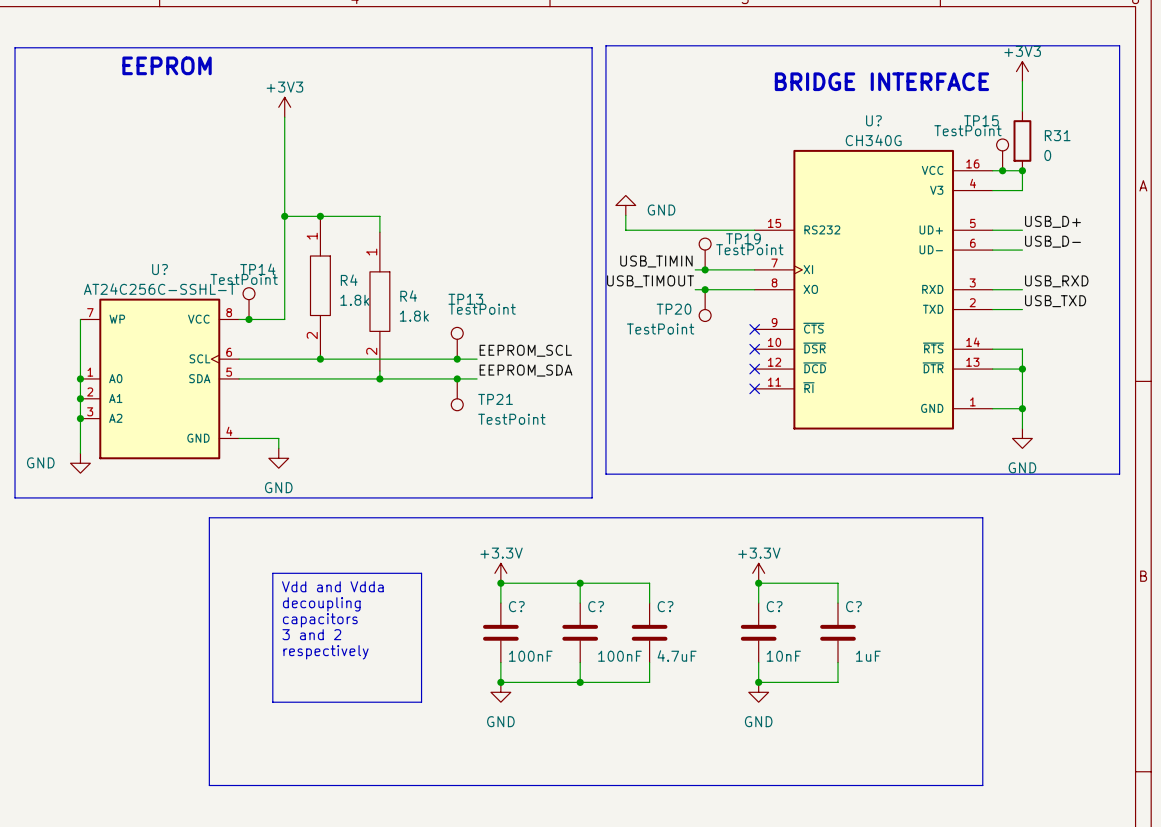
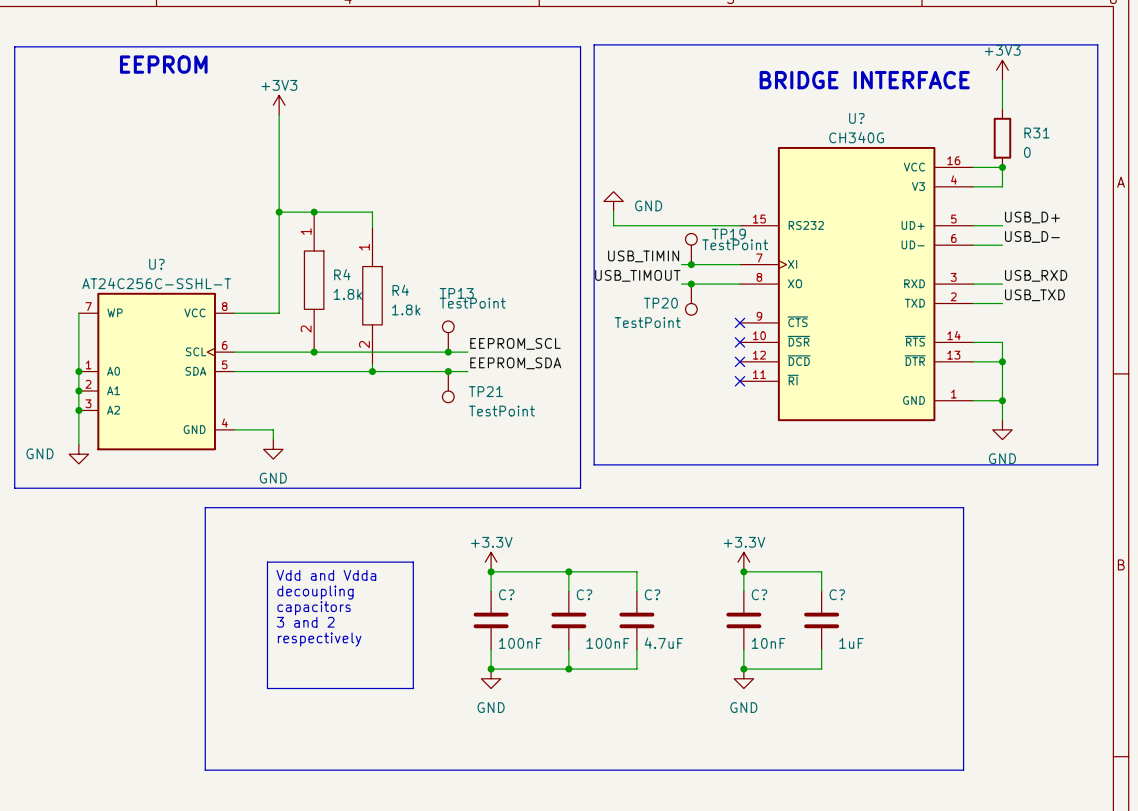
TP15: TestPoint (1002, 154) -> none
junction: (1002, 170) -> none
TP14: TestPoint (249, 303) -> none
junction: (249, 319) -> none

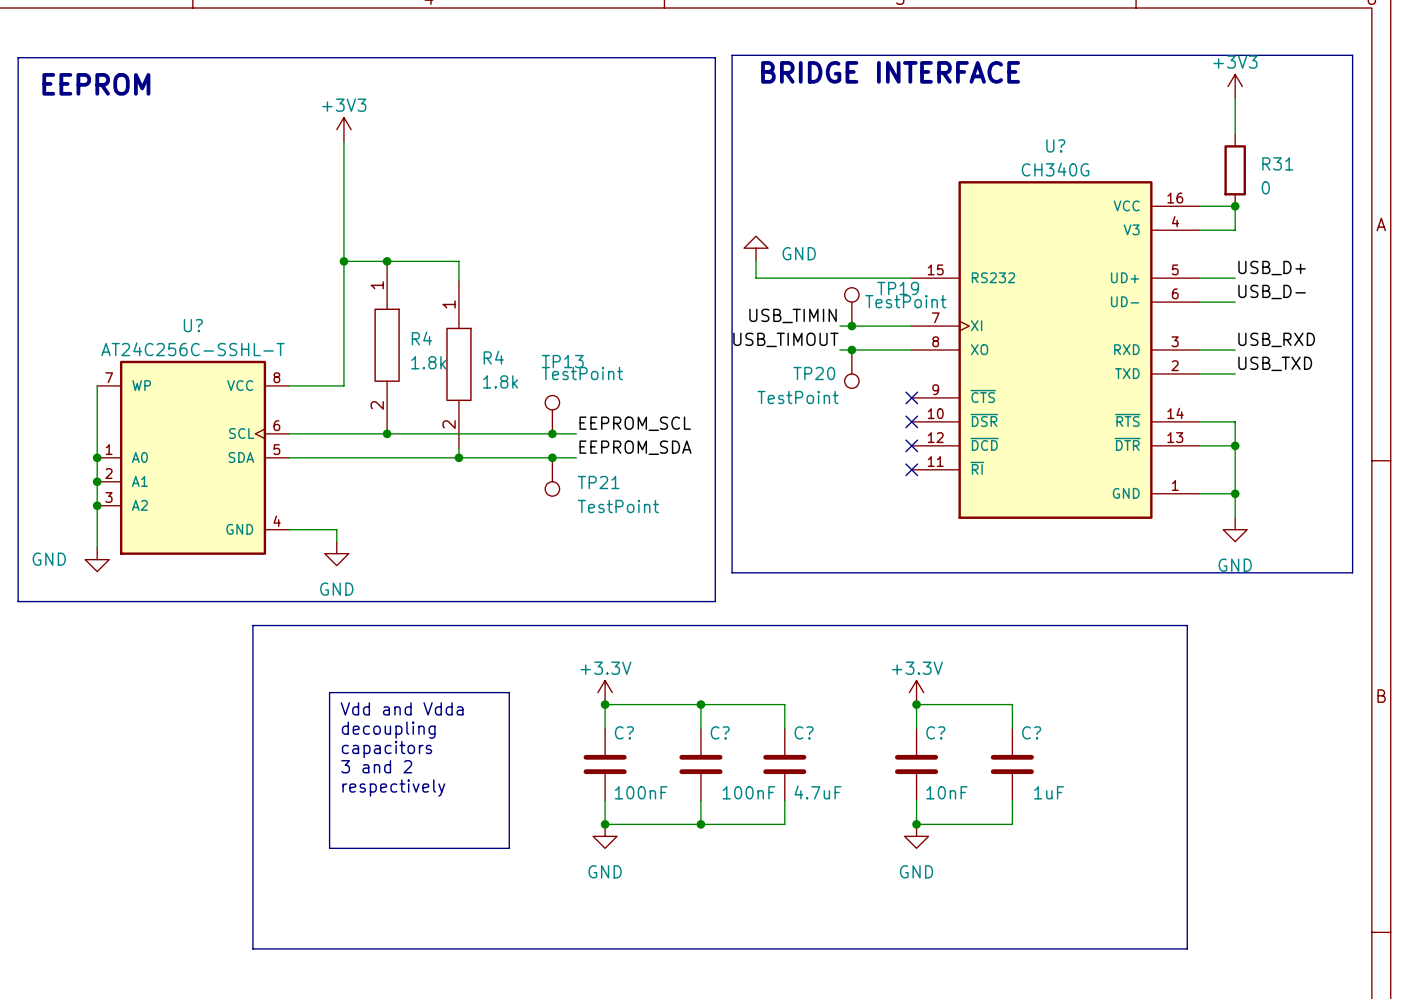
text position: EEPROM (163, 64) -> EEPROM (96, 84)
text position: BRIDGE INTERFACE (864, 80) -> BRIDGE INTERFACE (890, 72)

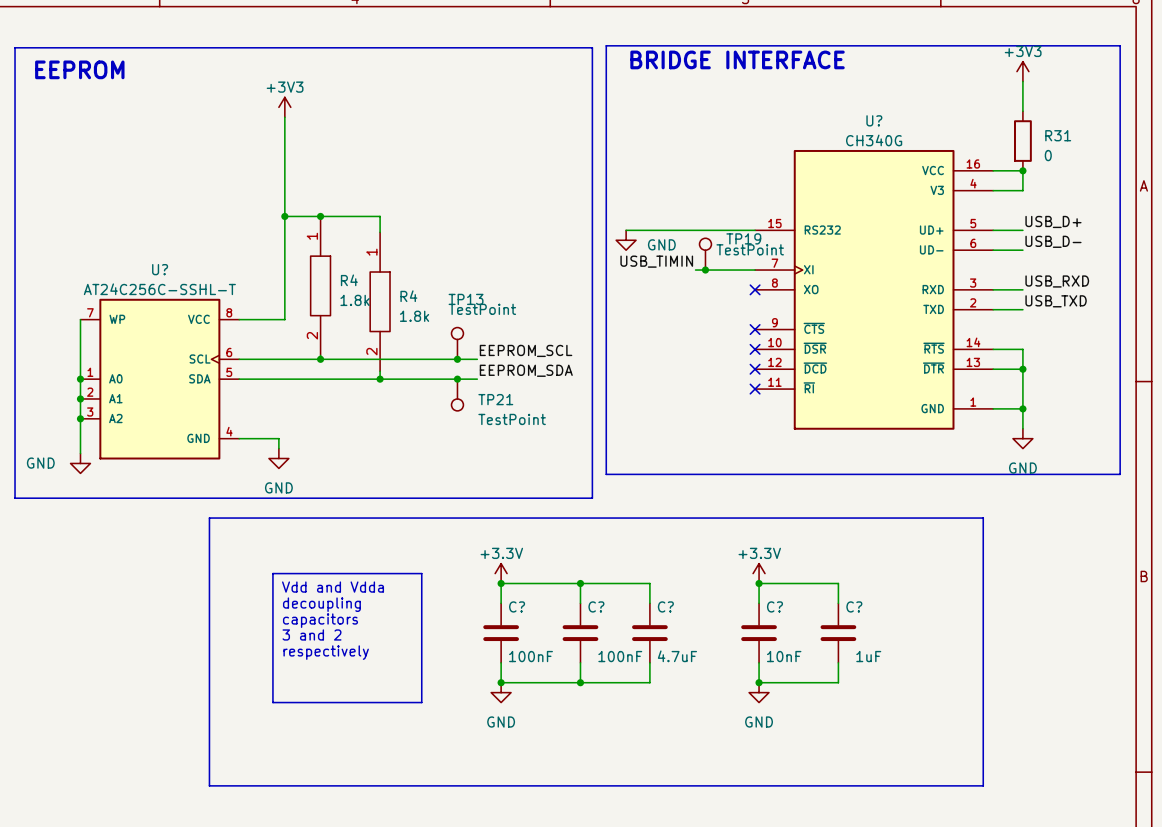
power symbol rotation: 0° (756, 248) -> 180° (626, 240)
power symbol position: GND (756, 248) -> GND (626, 240)
wire: (756, 260) (756, 278) -> none
label: USB_TIMOUT (785, 339) -> none
wire: (839, 350) (911, 350) -> none
junction: (851, 350) -> none
no-connect mark: none -> (755, 289)
TP20: TestPoint (851, 369) -> none

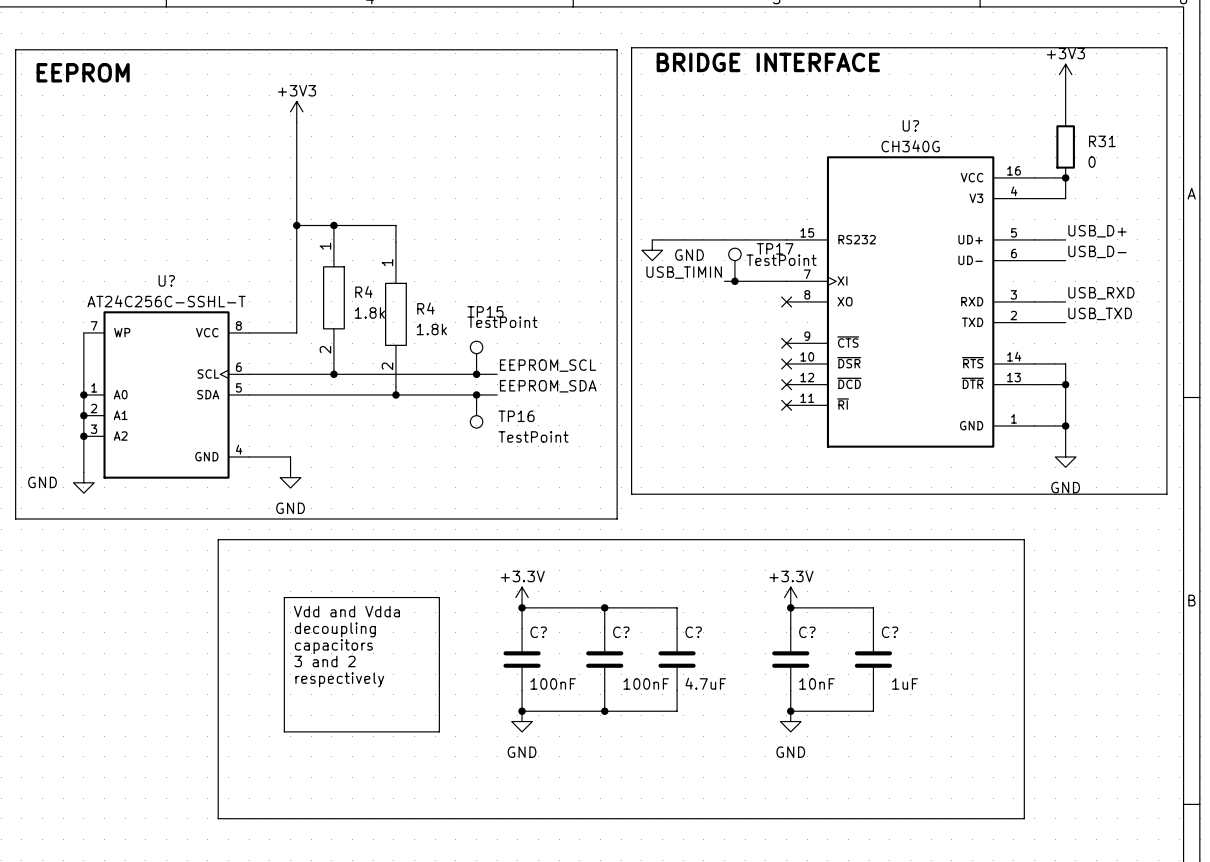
TP19 name: TP19 (743, 238) -> TP17 (775, 248)
TP13 name: TP13 (466, 299) -> TP15 (485, 311)
TP21 name: TP21 (495, 399) -> TP16 (516, 416)

